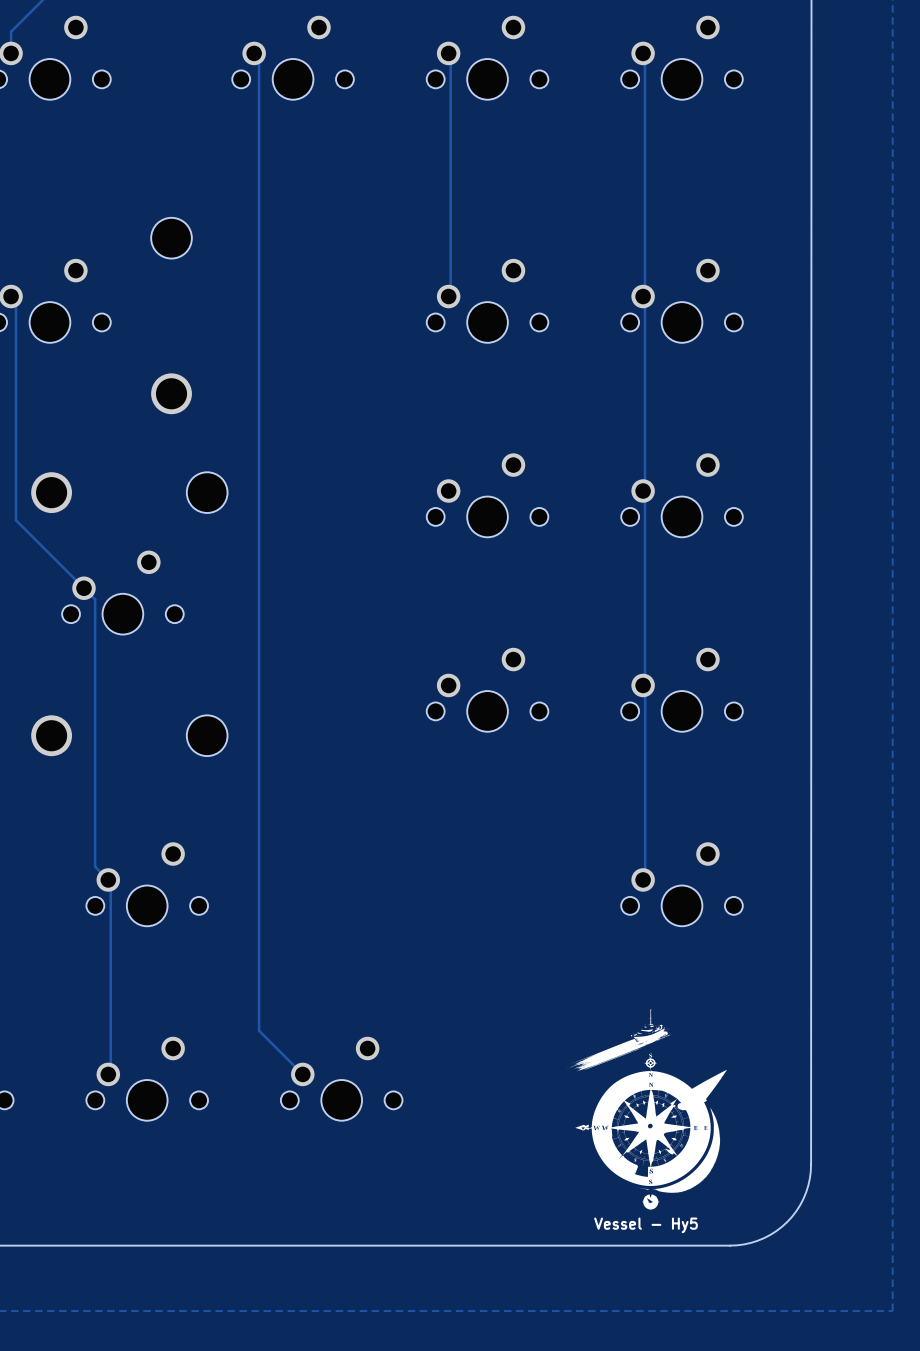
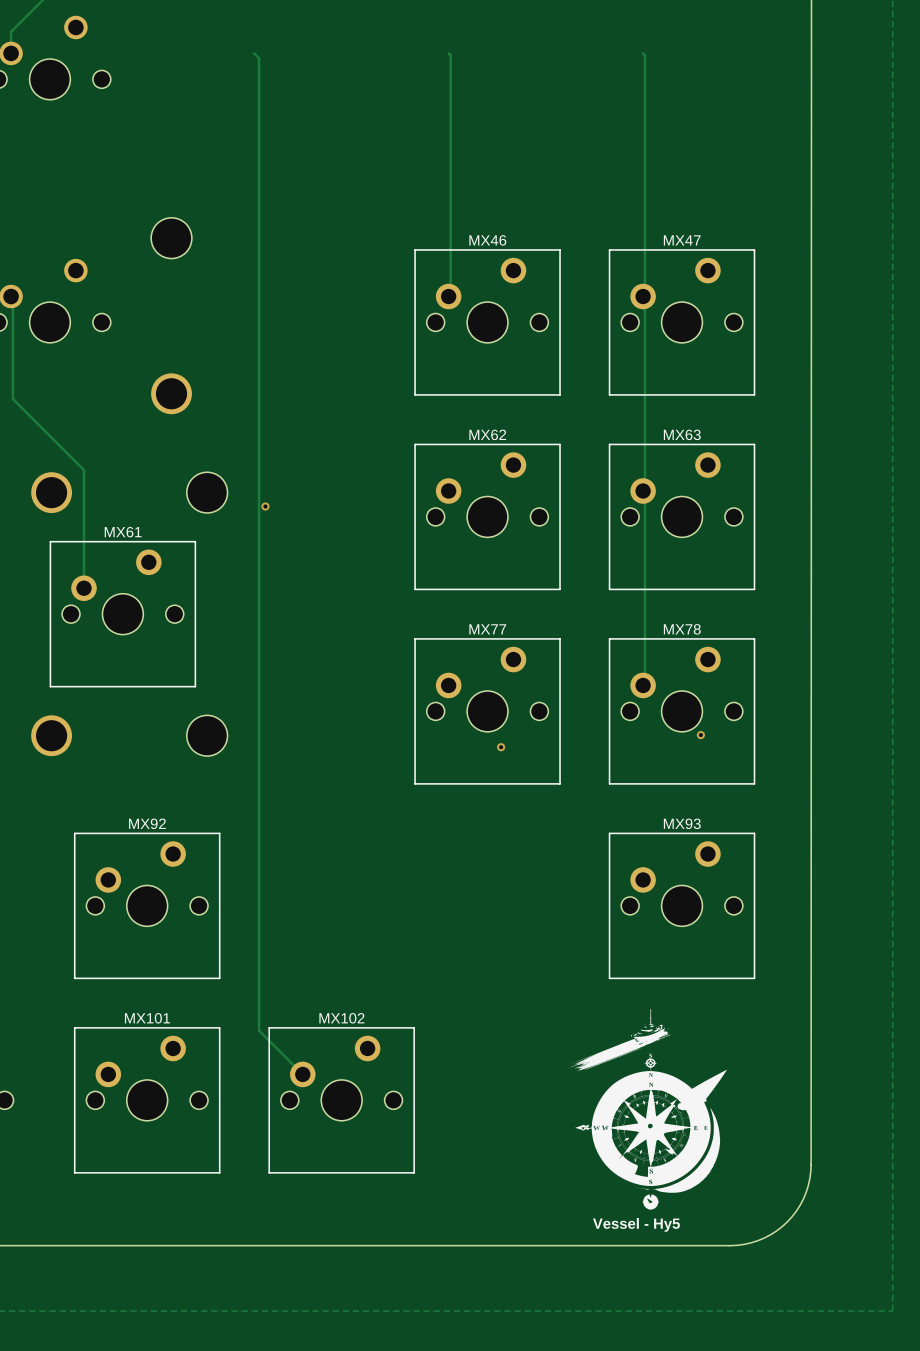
part: (293, 57) -> none
part: (487, 57) -> none
part: (682, 57) -> none
track: (12, 298) (15, 301) (15, 520) (95, 599) (95, 866) (110, 882) (110, 1071) (108, 1074) -> (12, 298) (12, 399) (84, 470) (84, 588)
part: (487, 300) -> none
part: (682, 300) -> none
MX46: none -> (487, 322)
MX47: none -> (682, 322)
part: (487, 495) -> none
part: (682, 495) -> none
via: none -> (265, 506)
MX62: none -> (487, 516)
MX63: none -> (682, 516)
part: (122, 592) -> none
MX61: none -> (122, 614)
track: (643, 685) (645, 687) (645, 877) (643, 879) -> none
part: (487, 689) -> none
part: (682, 689) -> none
MX77: none -> (487, 711)
MX78: none -> (682, 711)
via: none -> (700, 735)
via: none -> (501, 747)
part: (147, 884) -> none
part: (682, 884) -> none
MX92: none -> (147, 905)
MX93: none -> (682, 905)
part: (147, 1078) -> none
part: (341, 1078) -> none
MX101: none -> (147, 1100)
MX102: none -> (341, 1100)

